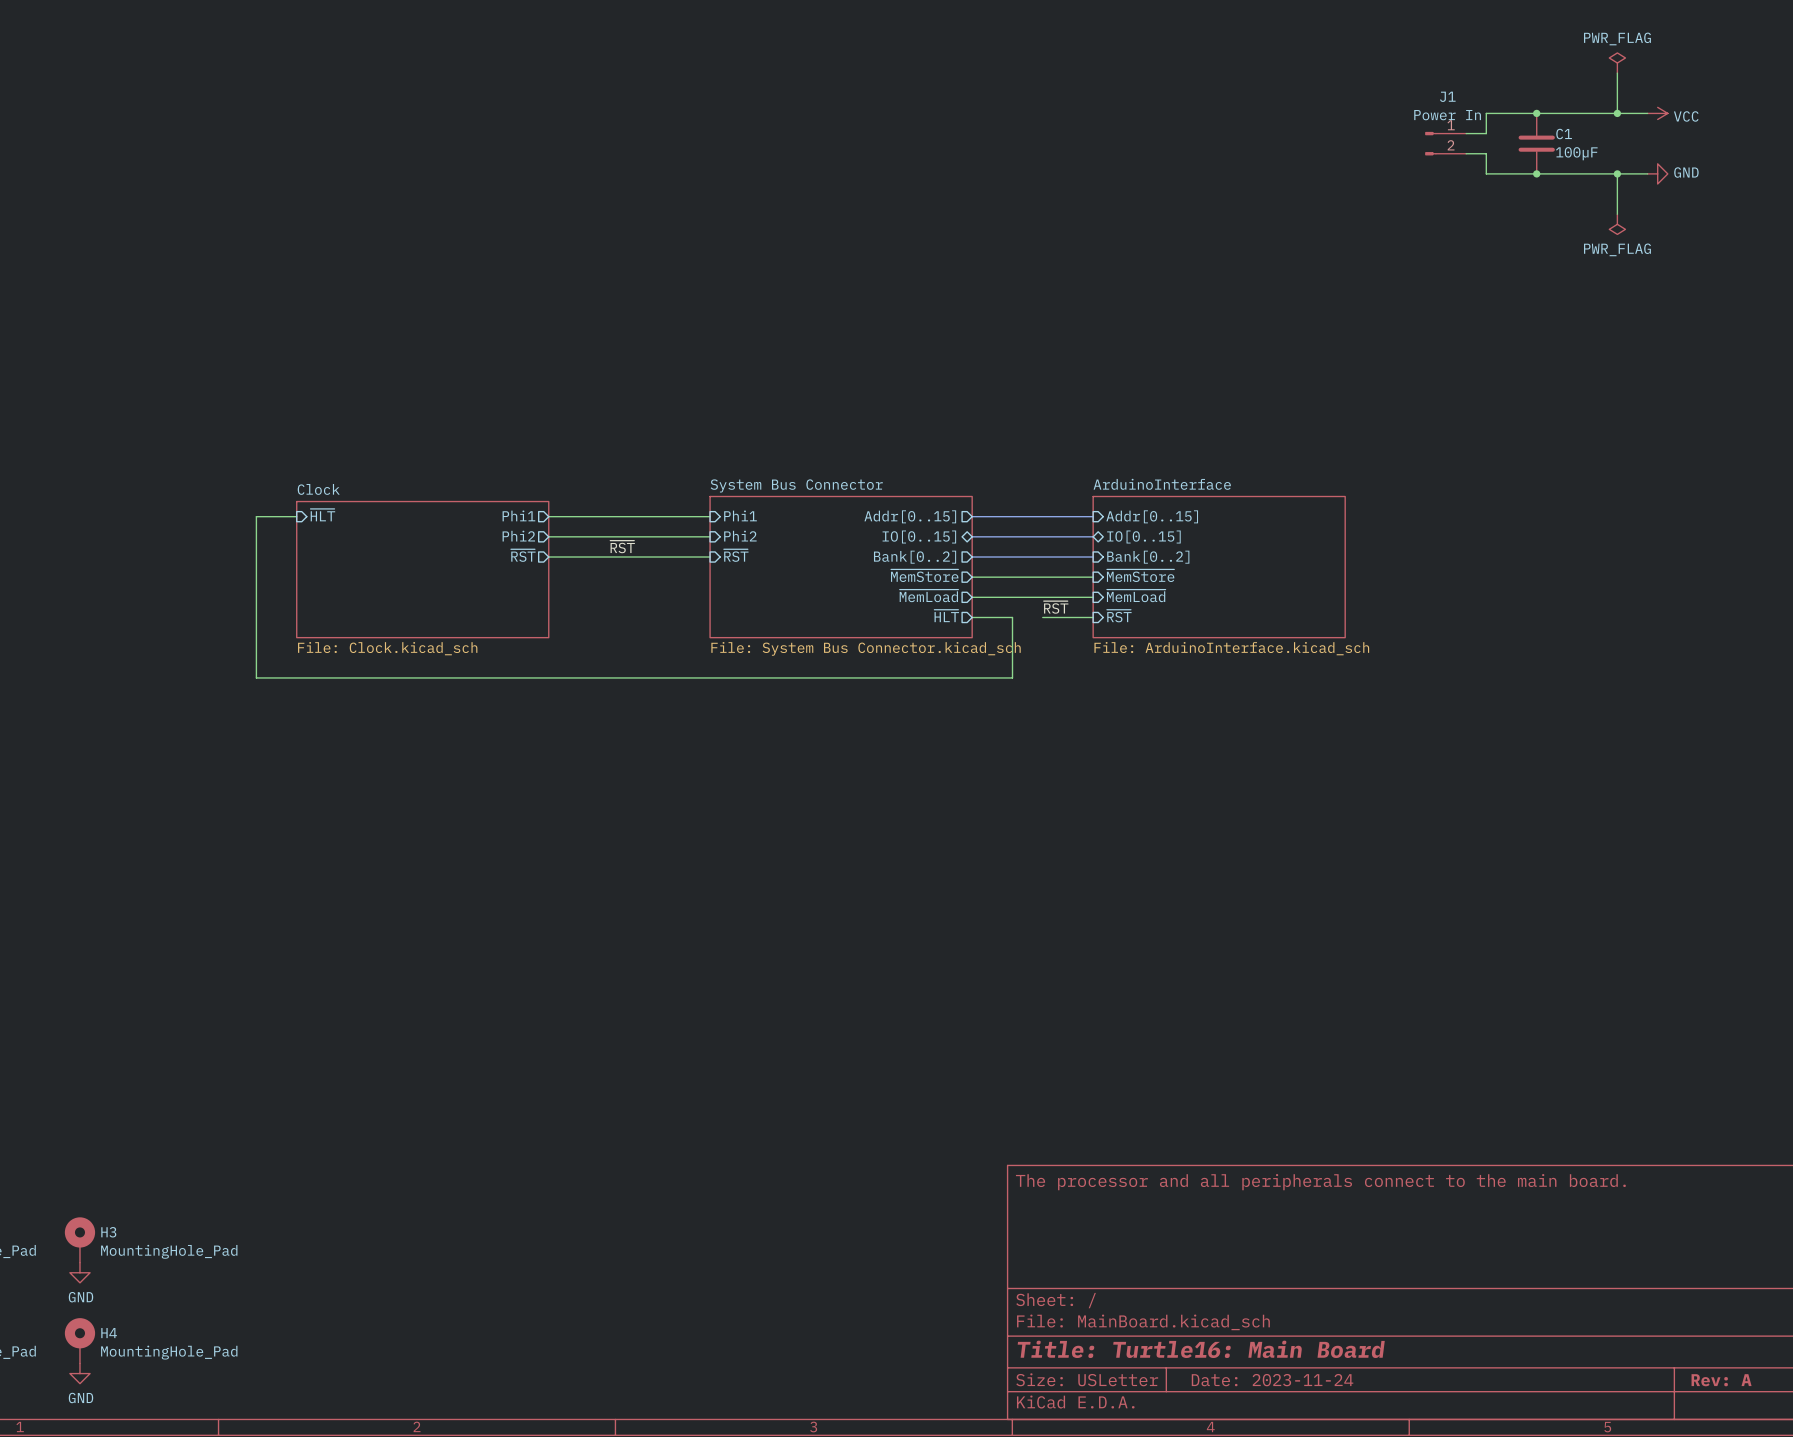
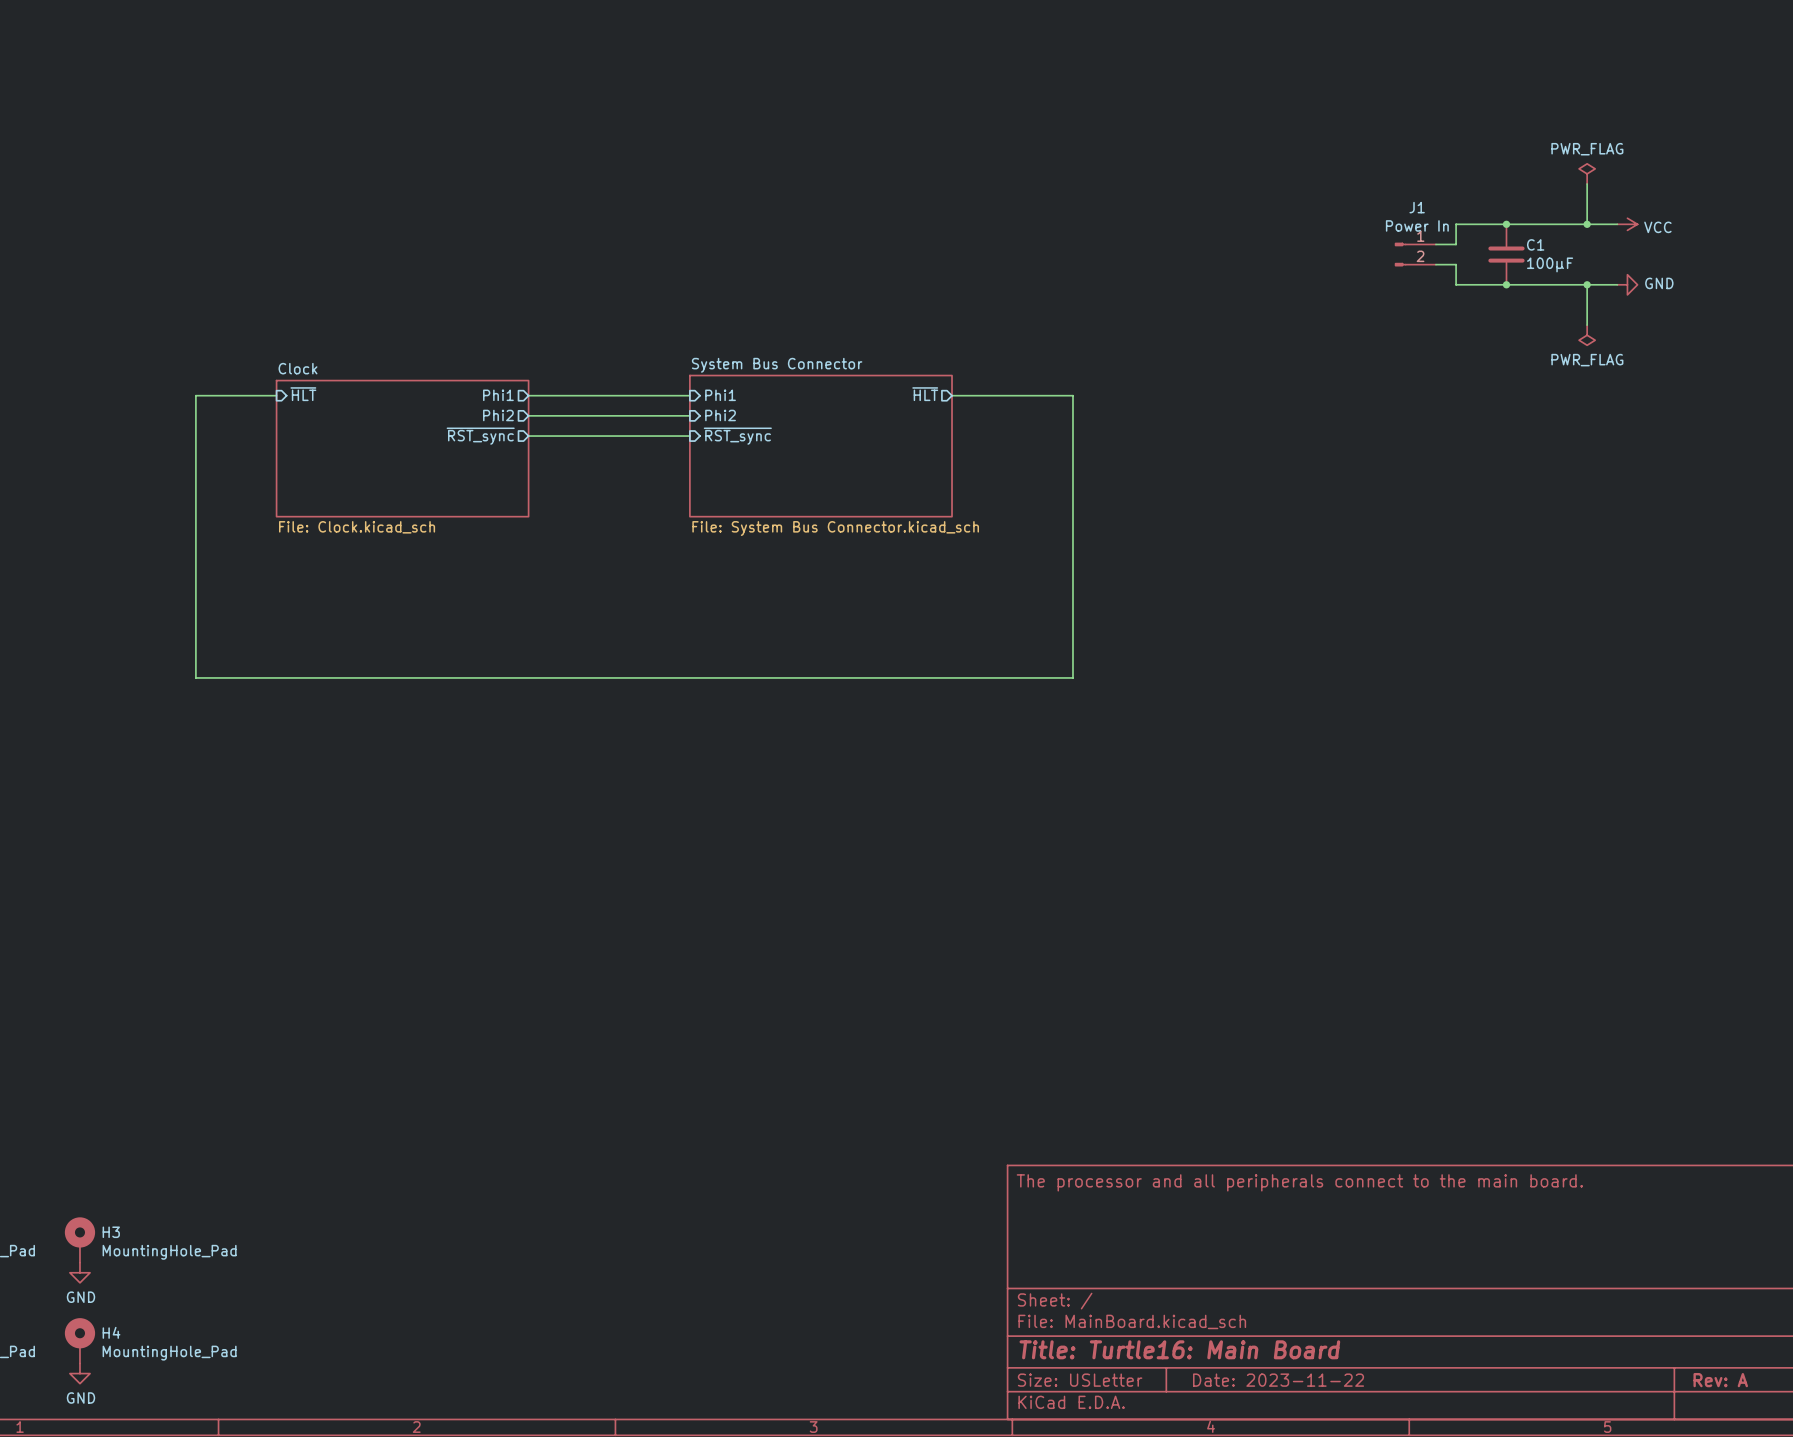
power symbol: PWR_FLAG (1617, 63) -> none
wire: (1617, 73) (1617, 113) -> (1587, 183) (1587, 224)
junction: (1536, 113) -> none
junction: (1617, 113) -> none
wire: (1647, 113) (1486, 113) (1486, 133) (1466, 133) -> (1617, 224) (1456, 224) (1456, 244) (1435, 244)
power symbol position: VCC (1657, 113) -> VCC (1627, 224)
J1 position: (1445, 143) -> (1415, 254)
C1 position: (1536, 143) -> (1506, 254)
wire: (1466, 153) (1486, 153) (1486, 173) (1647, 173) -> (1435, 264) (1456, 264) (1456, 284) (1617, 284)
junction: (1536, 173) -> none
power symbol: none -> PWR_FLAG (1587, 173)
wire: (1617, 173) (1617, 214) -> (1587, 284) (1587, 325)
junction: (1617, 173) -> none
power symbol position: GND (1657, 173) -> GND (1627, 284)
junction: none -> (1506, 224)
junction: none -> (1587, 224)
power symbol: PWR_FLAG (1617, 224) -> none
junction: none -> (1506, 284)
junction: none -> (1587, 284)
power symbol: none -> PWR_FLAG (1587, 335)
sheet pin: none -> Phi1 (498, 395)
sheet pin: none -> Phi1 (720, 395)
sheet pin: none -> ~{HLT} (925, 394)
sheet pin: none -> Phi2 (498, 415)
sheet pin: none -> Phi2 (720, 415)
sheet pin: none -> ~{RST_sync} (480, 436)
sheet pin: none -> ~{RST_sync} (737, 436)
sheet pin position: ~{HLT} (322, 515) -> ~{HLT} (303, 394)
sheet pin: Phi1 (518, 515) -> none
sheet pin: Phi1 (740, 515) -> none
wire: (296, 516) (256, 516) (256, 677) -> (276, 395) (195, 395) (195, 677) (256, 677)
wire: (548, 516) (710, 516) -> (528, 395) (689, 395)
sheet pin: Addr[0..15] (910, 516) -> none
bus: (972, 516) (1093, 516) -> none
sheet pin: Addr[0..15] (1152, 516) -> none
sheet pin: Phi2 (518, 536) -> none
wire: (548, 536) (710, 536) -> (528, 415) (689, 415)
sheet pin: Phi2 (740, 536) -> none
bus: (972, 536) (1093, 536) -> none
sheet pin: IO[0..15] (919, 537) -> none
sheet pin: IO[0..15] (1143, 537) -> none
label: ~{RST} (622, 546) -> none
sheet pin: ~{RST} (523, 555) -> none
sheet pin: ~{RST} (736, 555) -> none
wire: (548, 557) (710, 557) -> (528, 436) (689, 436)
sheet pin: Bank[0..2] (915, 557) -> none
bus: (972, 557) (1093, 557) -> none
sheet pin: Bank[0..2] (1148, 557) -> none
sheet System Bus Connector position: (841, 567) -> (820, 446)
sheet ArduinoInterface: File: ArduinoInterface.kicad_sch (1219, 567) -> none
sheet Clock position: (422, 569) -> (402, 448)
sheet pin: ~{MemStore} (924, 575) -> none
sheet pin: ~{MemStore} (1140, 575) -> none
wire: (972, 577) (1093, 577) -> none
sheet pin: ~{MemLoad} (929, 595) -> none
sheet pin: ~{MemLoad} (1136, 595) -> none
wire: (972, 597) (1093, 597) -> none
label: ~{RST} (1056, 607) -> none
sheet pin: ~{HLT} (946, 615) -> none
sheet pin: ~{RST} (1119, 616) -> none
wire: (972, 617) (1012, 617) (1012, 677) -> (952, 395) (1072, 395) (1072, 677) (1012, 677)
wire: (1042, 617) (1093, 617) -> none
title block: Date: 2023-11-24 (1272, 1380) -> Date: 2023-11-22 (1278, 1380)

